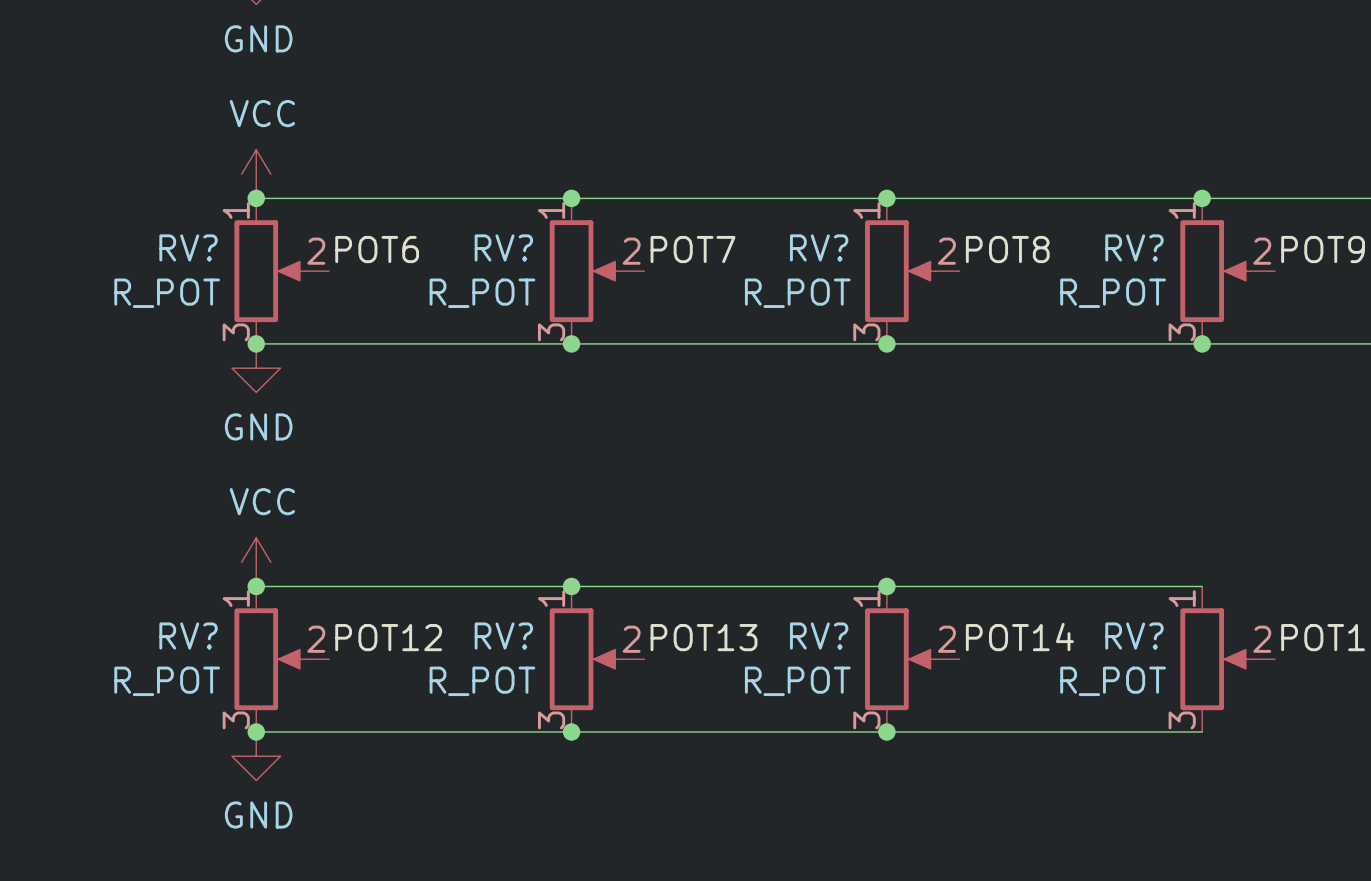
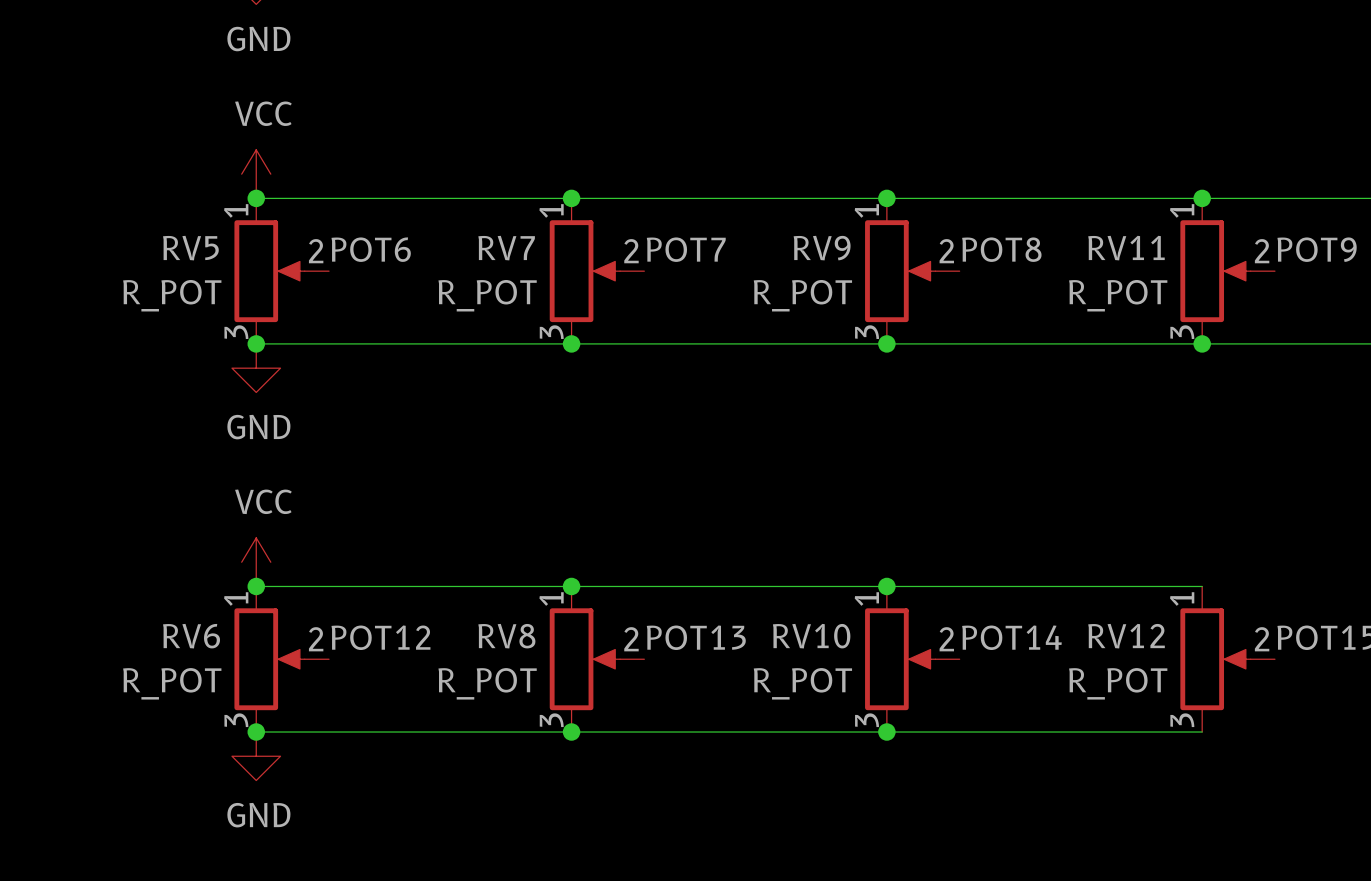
RV? name: RV? (188, 247) -> RV5 (190, 248)
RV? name: RV? (503, 247) -> RV7 (506, 248)
RV? name: RV? (819, 247) -> RV9 (822, 248)
RV? name: RV? (1134, 247) -> RV11 (1126, 248)
RV? name: RV? (188, 636) -> RV6 (191, 636)
RV? name: RV? (503, 636) -> RV8 (506, 636)
RV? name: RV? (819, 636) -> RV10 (811, 636)
RV? name: RV? (1134, 636) -> RV12 (1126, 636)

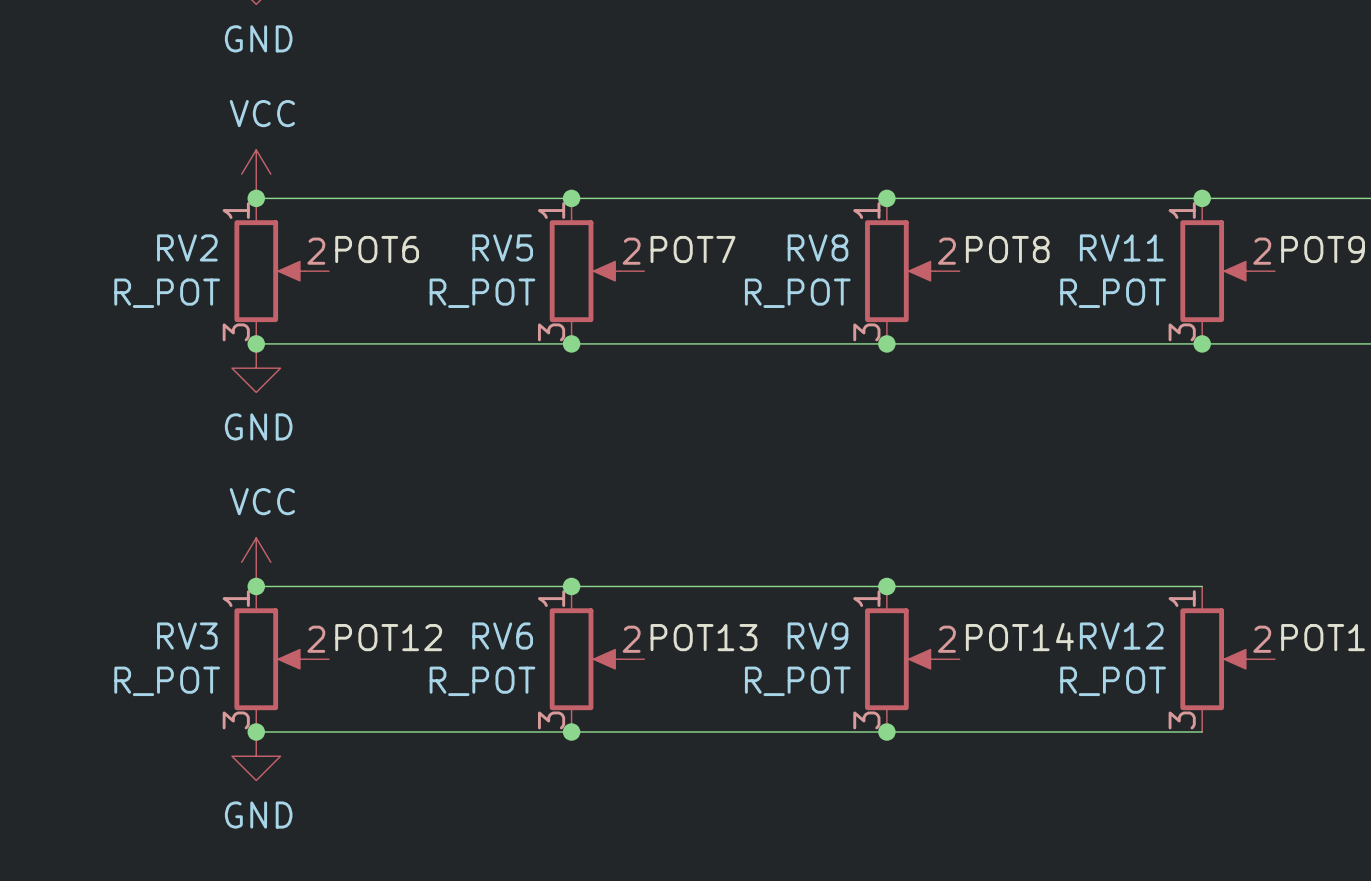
RV5 name: RV5 (190, 248) -> RV2 (187, 247)
RV7 name: RV7 (506, 248) -> RV5 (502, 247)
RV9 name: RV9 (822, 248) -> RV8 (818, 247)
RV6 name: RV6 (191, 636) -> RV3 (187, 636)
RV8 name: RV8 (506, 636) -> RV6 (502, 636)
RV10 name: RV10 (811, 636) -> RV9 (818, 636)

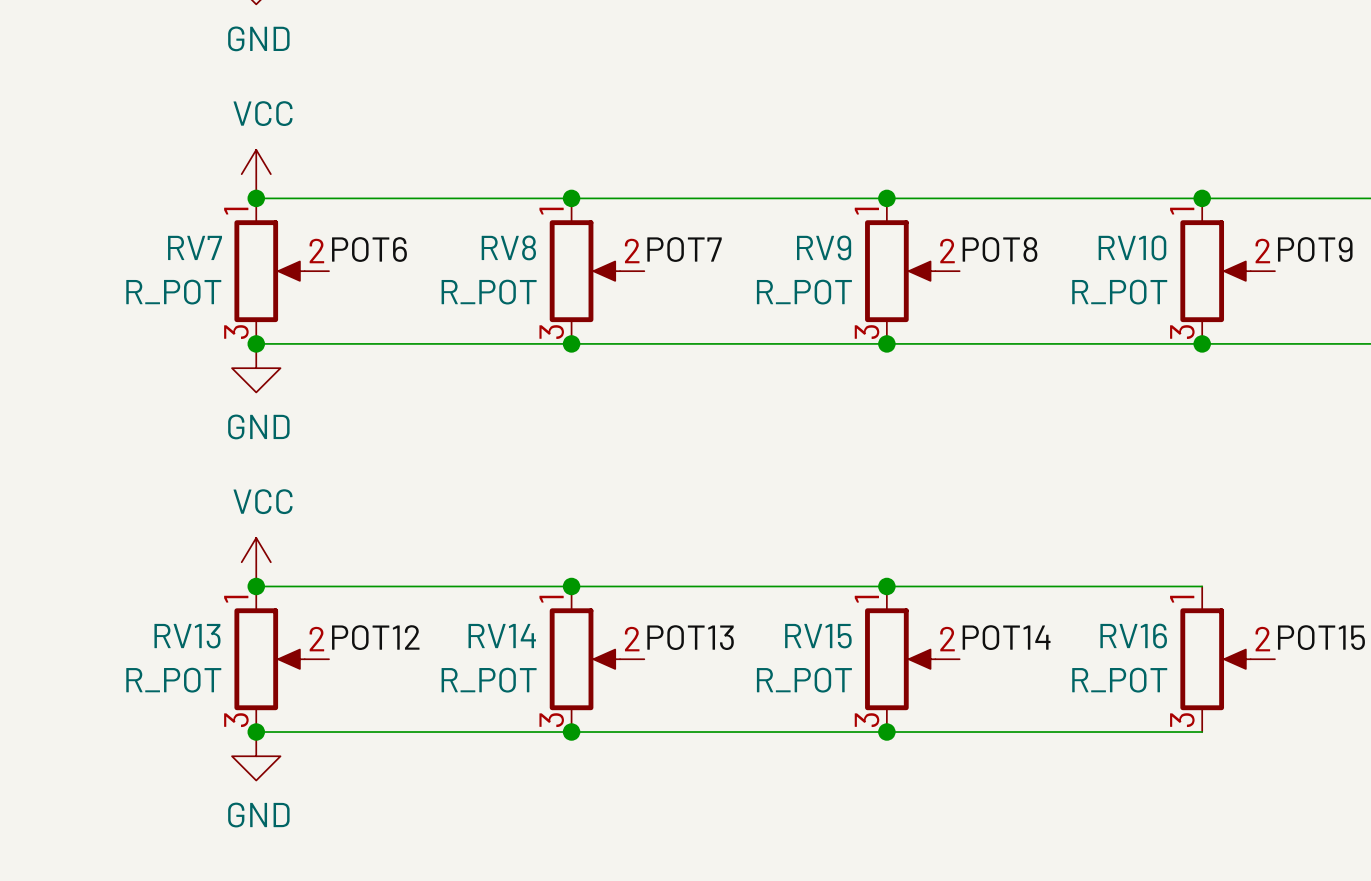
RV2 name: RV2 (187, 247) -> RV7 (195, 247)
RV5 name: RV5 (502, 247) -> RV8 (508, 247)
RV8 name: RV8 (818, 247) -> RV9 (824, 247)
RV11 name: RV11 (1121, 247) -> RV10 (1132, 247)
RV3 name: RV3 (187, 636) -> RV13 (187, 636)
RV6 name: RV6 (502, 636) -> RV14 (502, 636)
RV9 name: RV9 (818, 636) -> RV15 (818, 636)
RV12 name: RV12 (1121, 636) -> RV16 (1133, 636)

